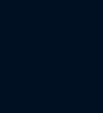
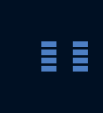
part: none -> (64, 56)

